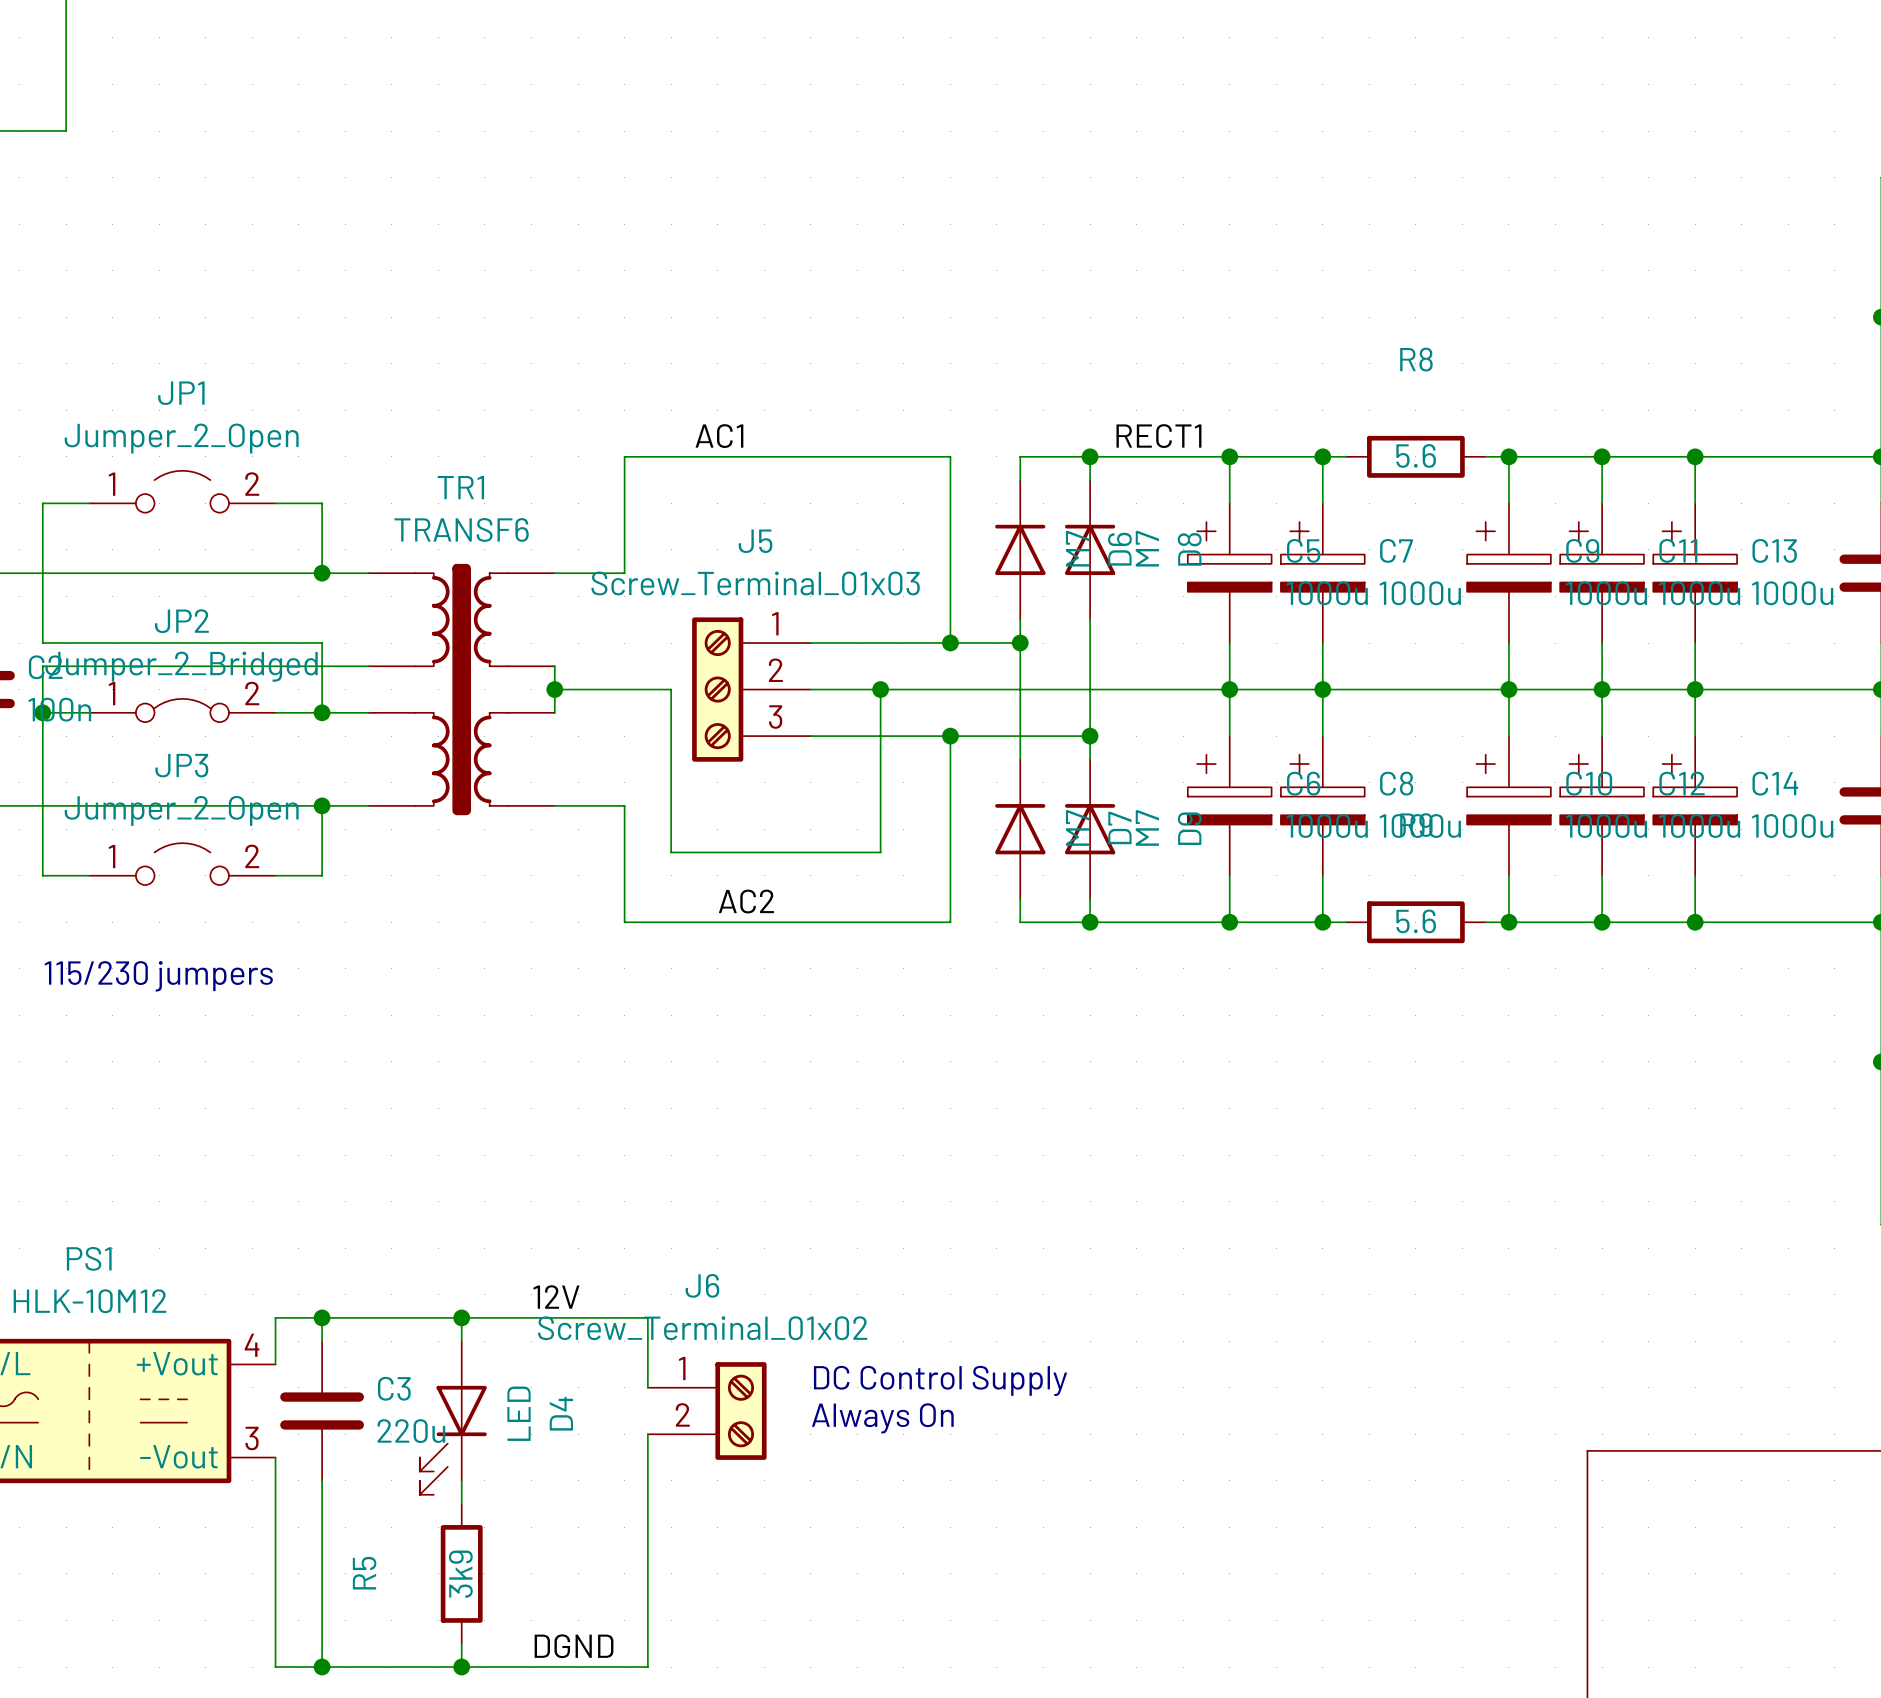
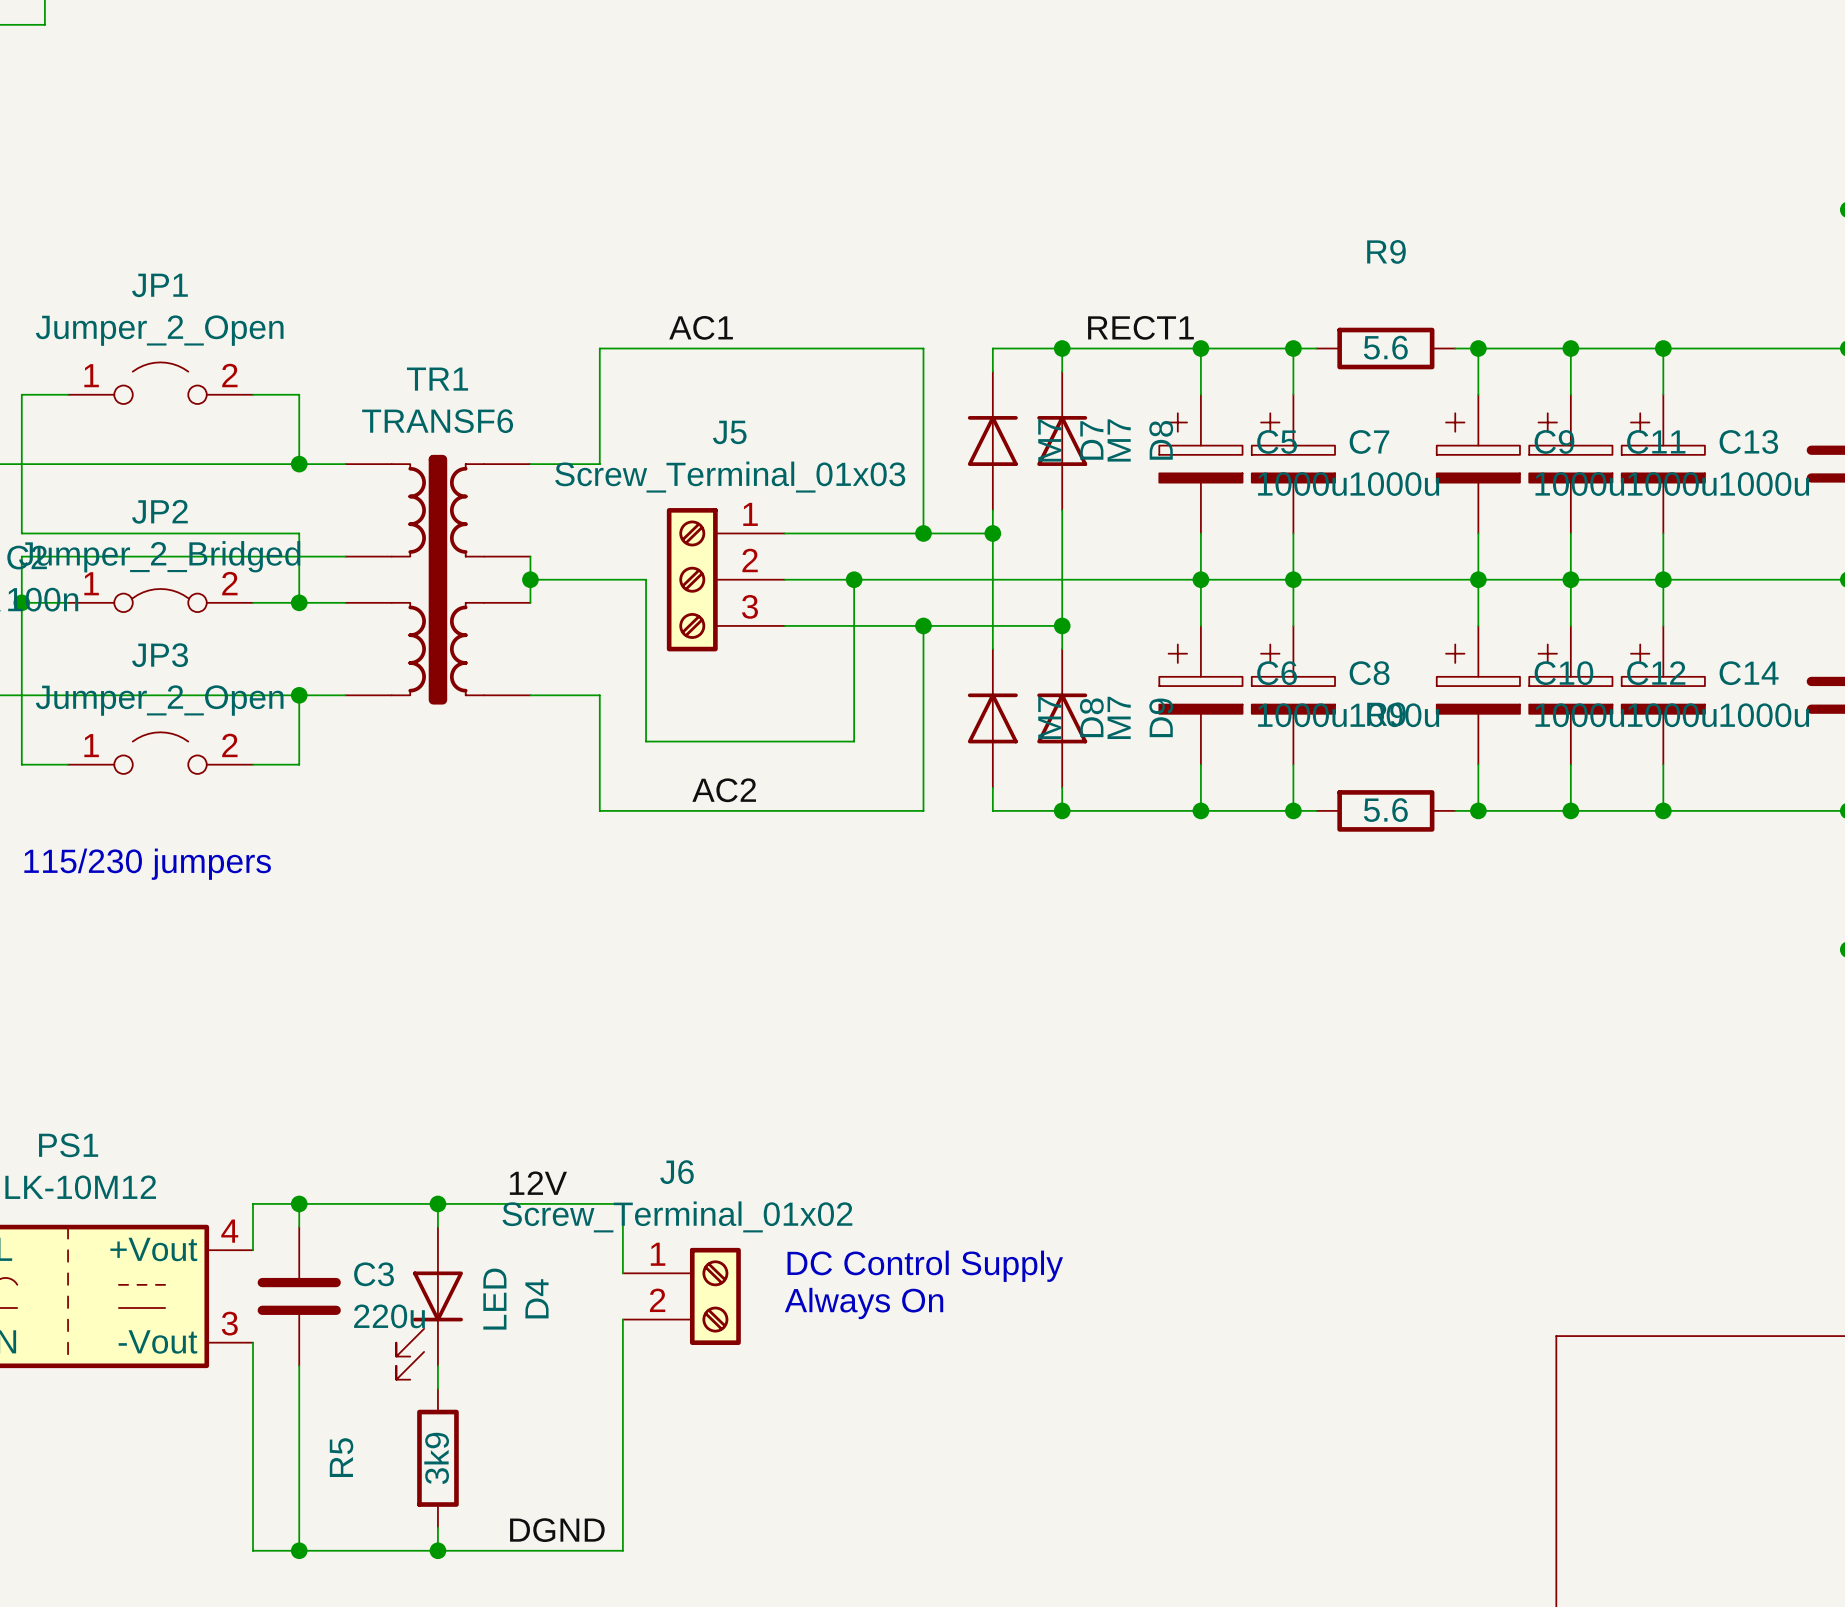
R8 name: R8 (1416, 359) -> R9 (1386, 251)
D6 name: D6 (1119, 549) -> D7 (1091, 440)
D7 name: D7 (1119, 827) -> D8 (1091, 717)

